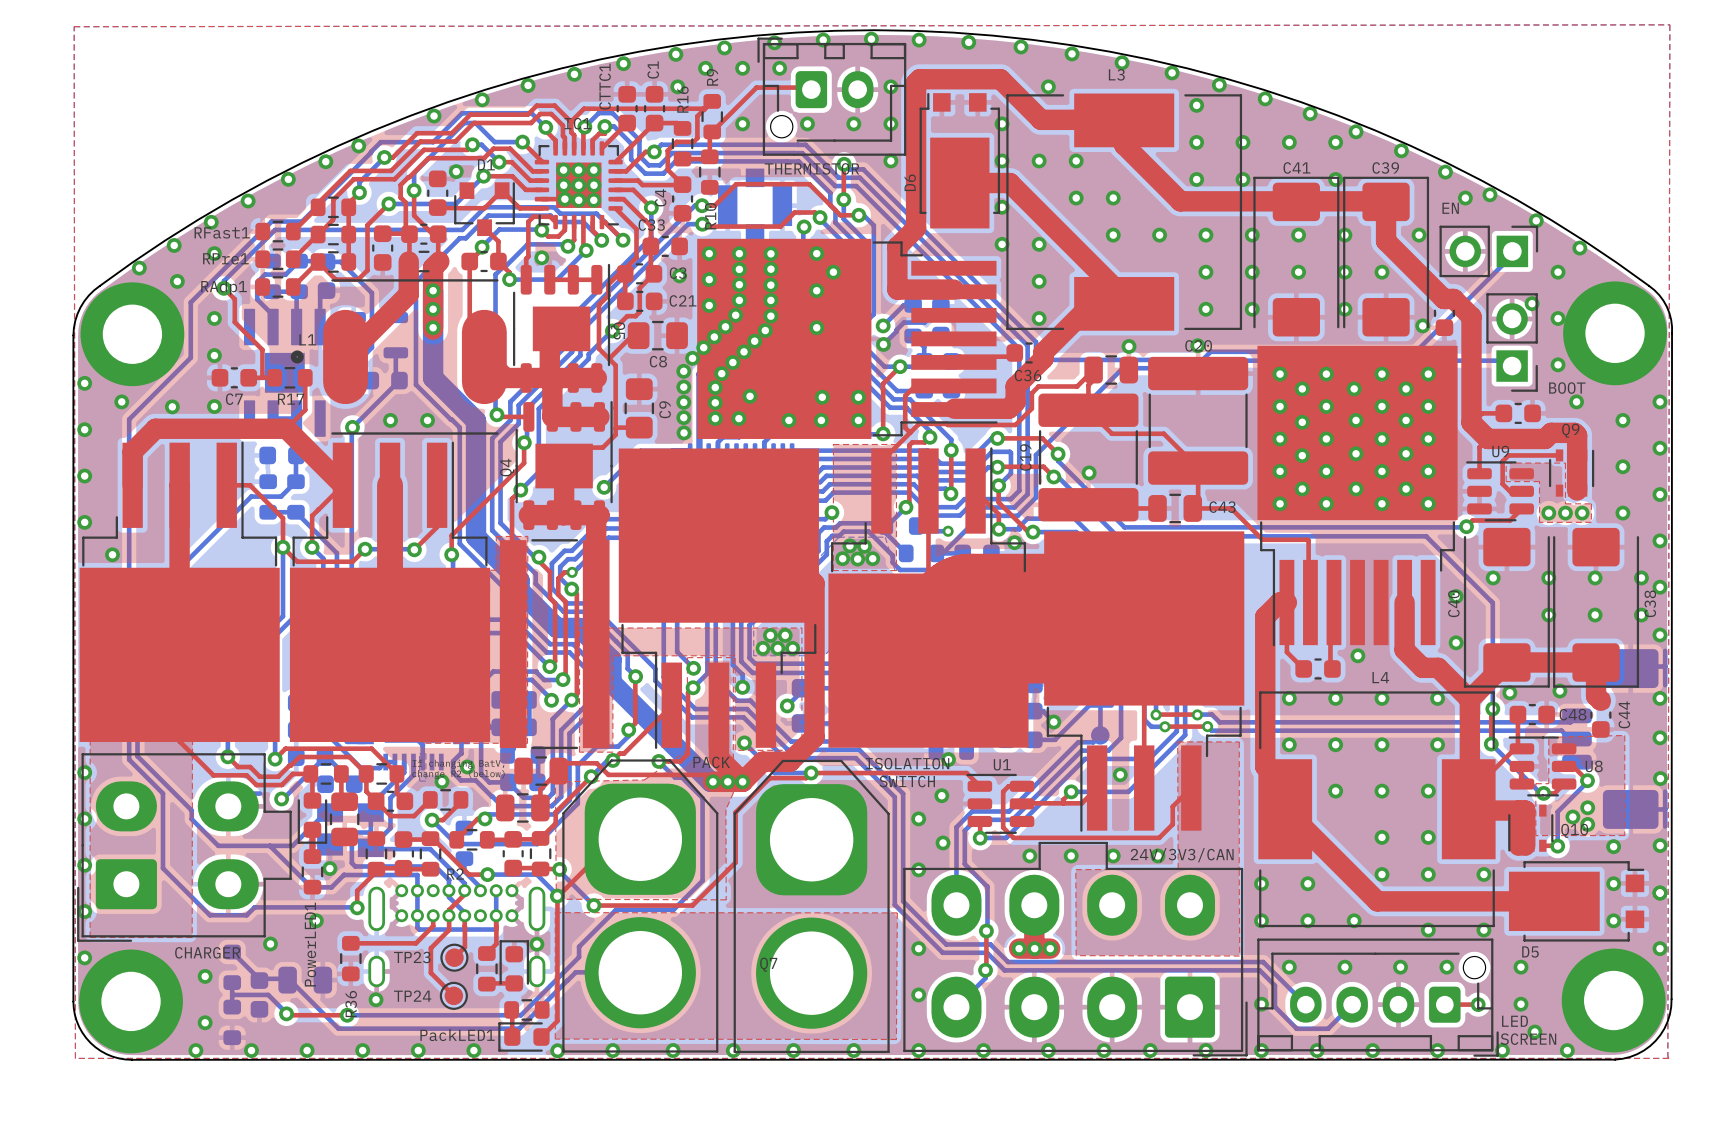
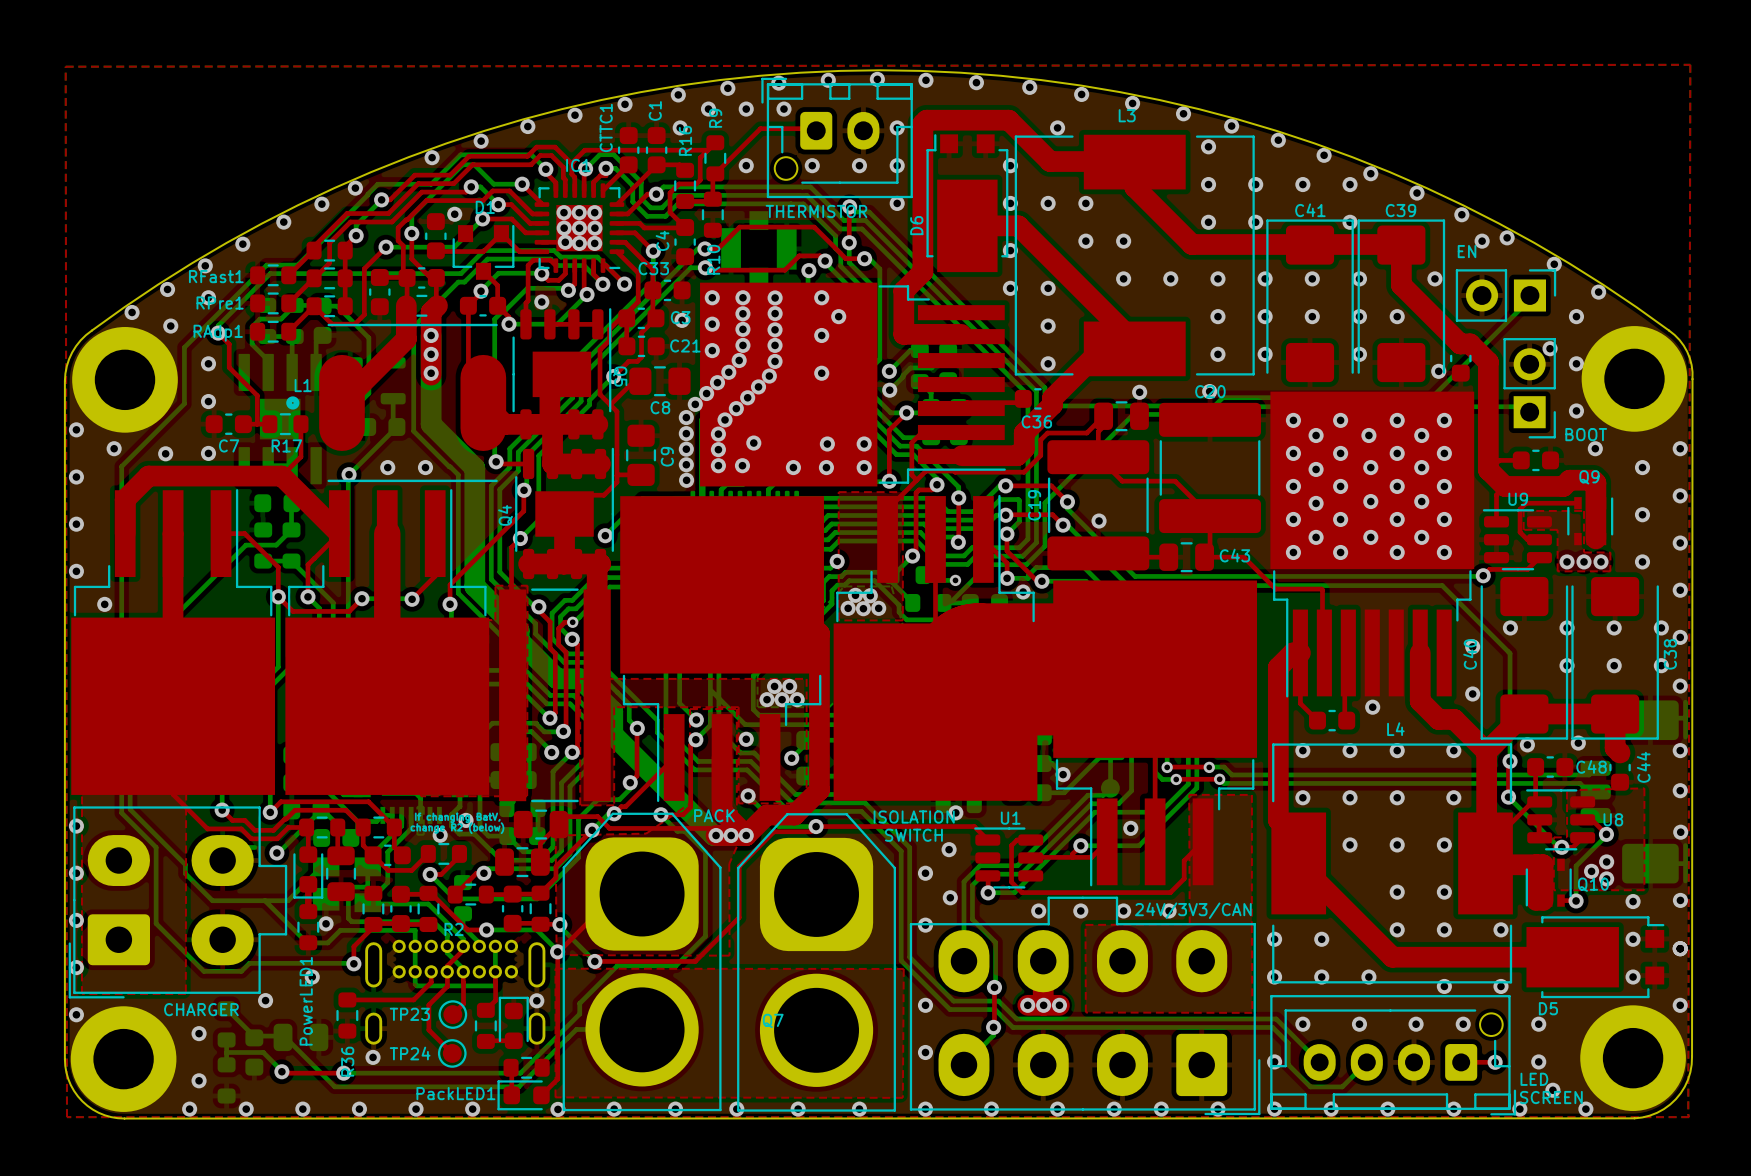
bottom track: (773, 578) (773, 589) (741, 621) (741, 661) (752, 672) -> (711, 690) (745, 724) (756, 724)
bottom track: (764, 586) (732, 618) (732, 664) (742, 674) (742, 687) -> none

